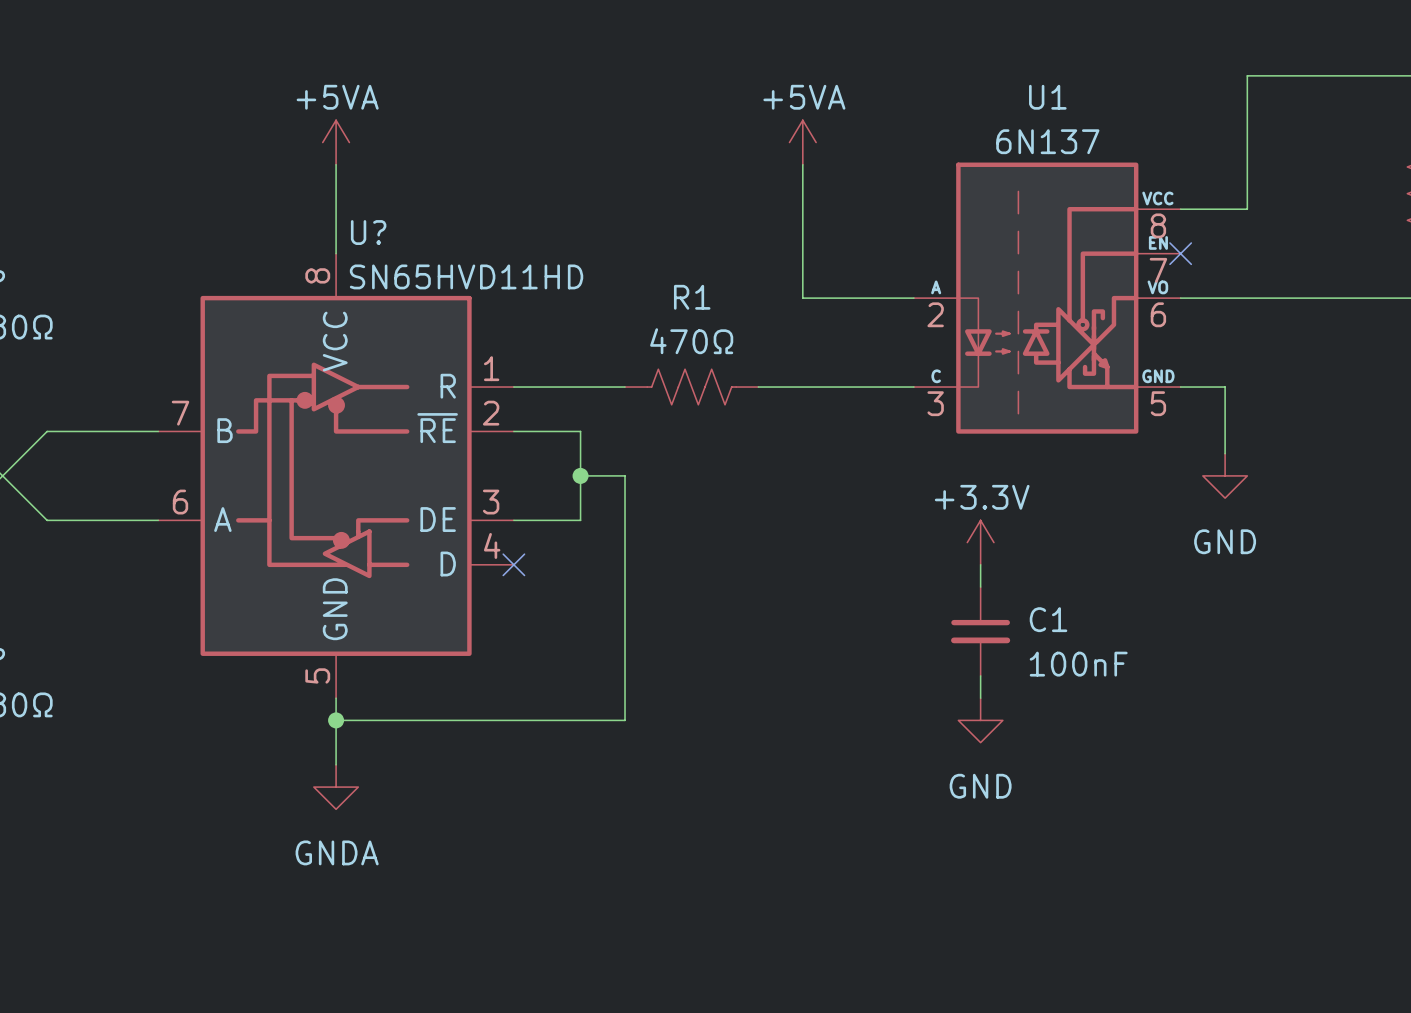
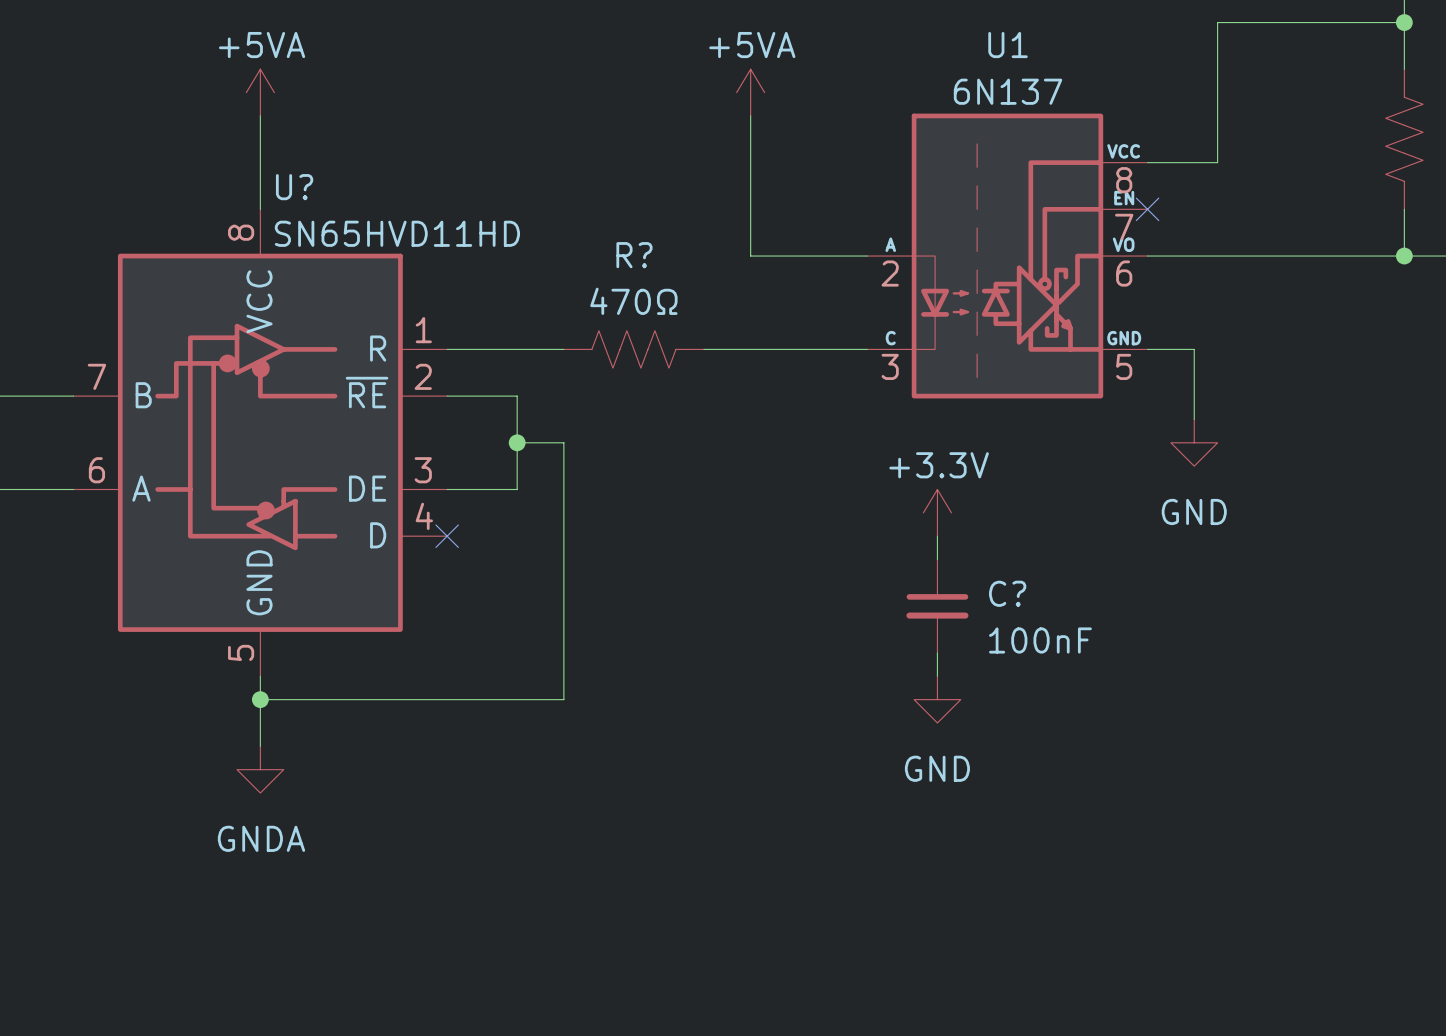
R1 name: R1 (692, 297) -> R? (634, 255)
C1 name: C1 (1048, 619) -> C? (1007, 593)

